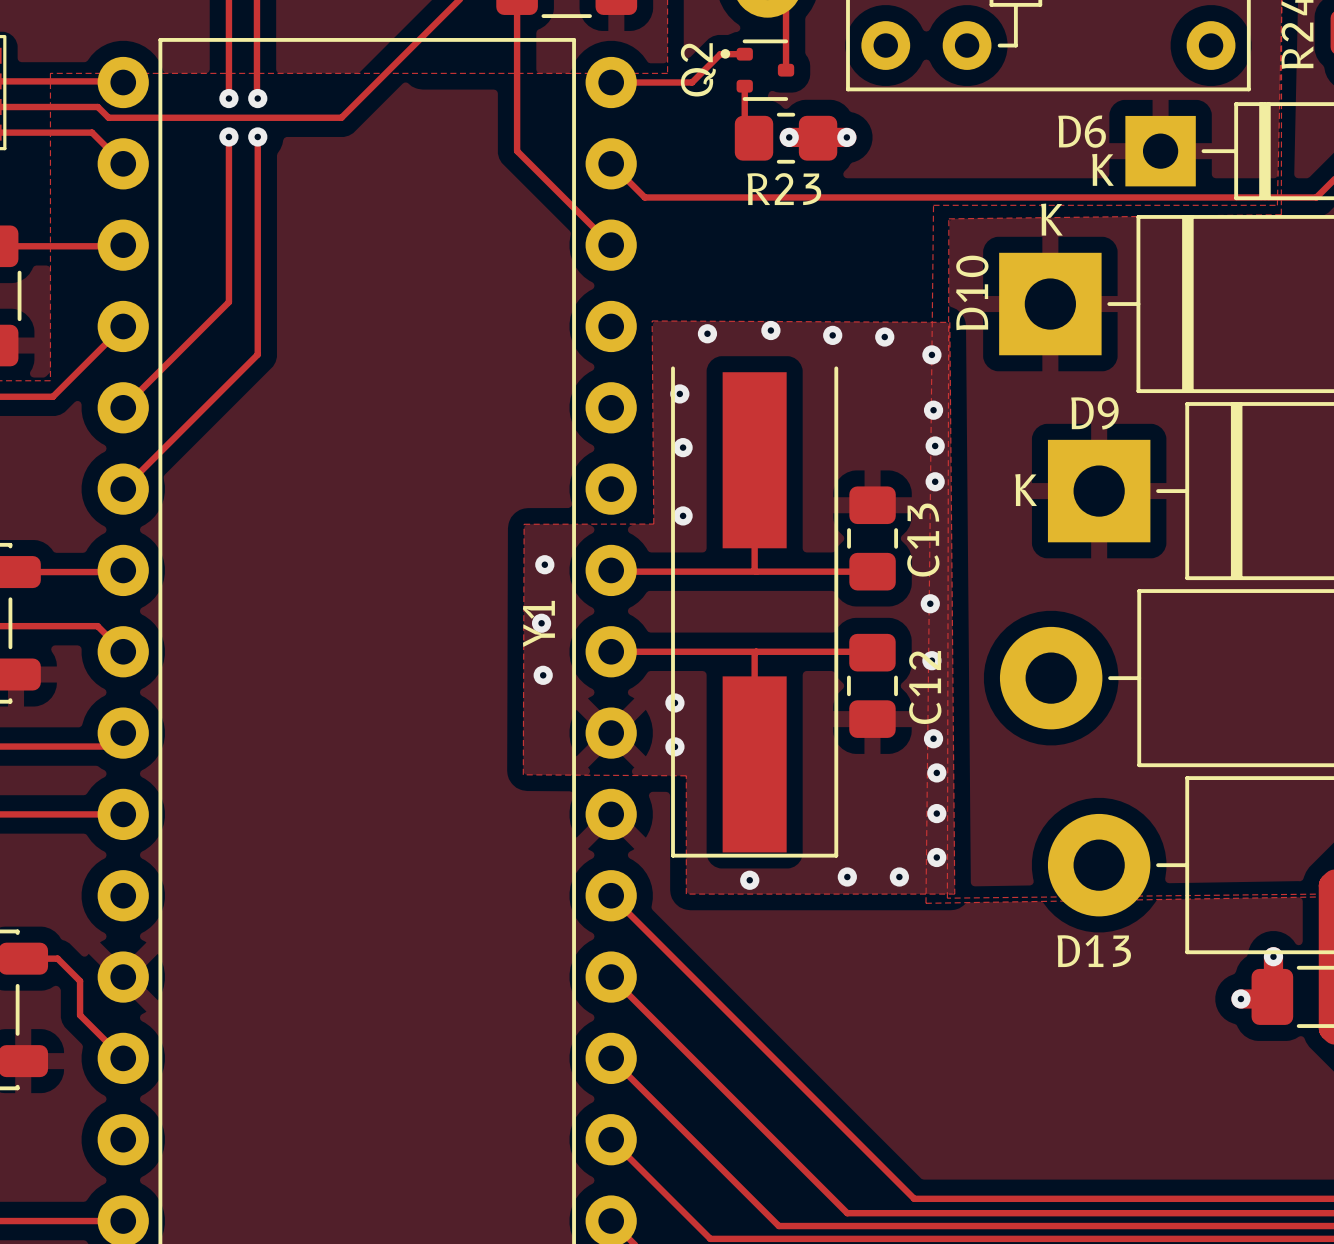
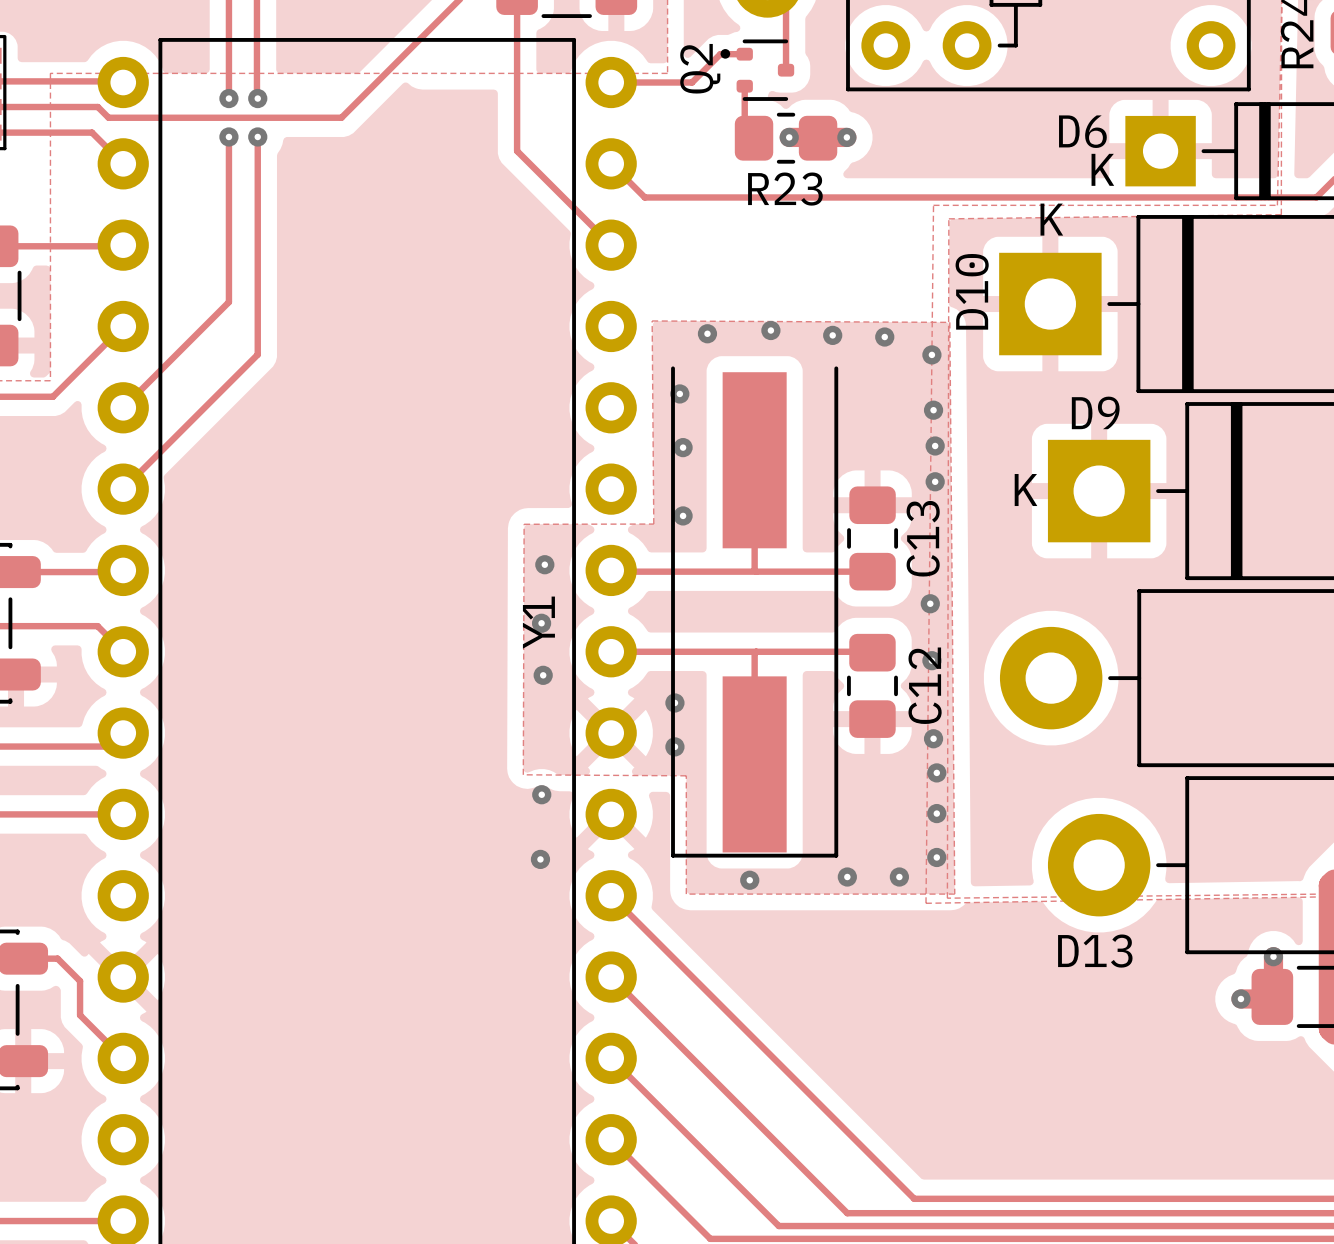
via: none -> (541, 794)
via: none -> (540, 859)

